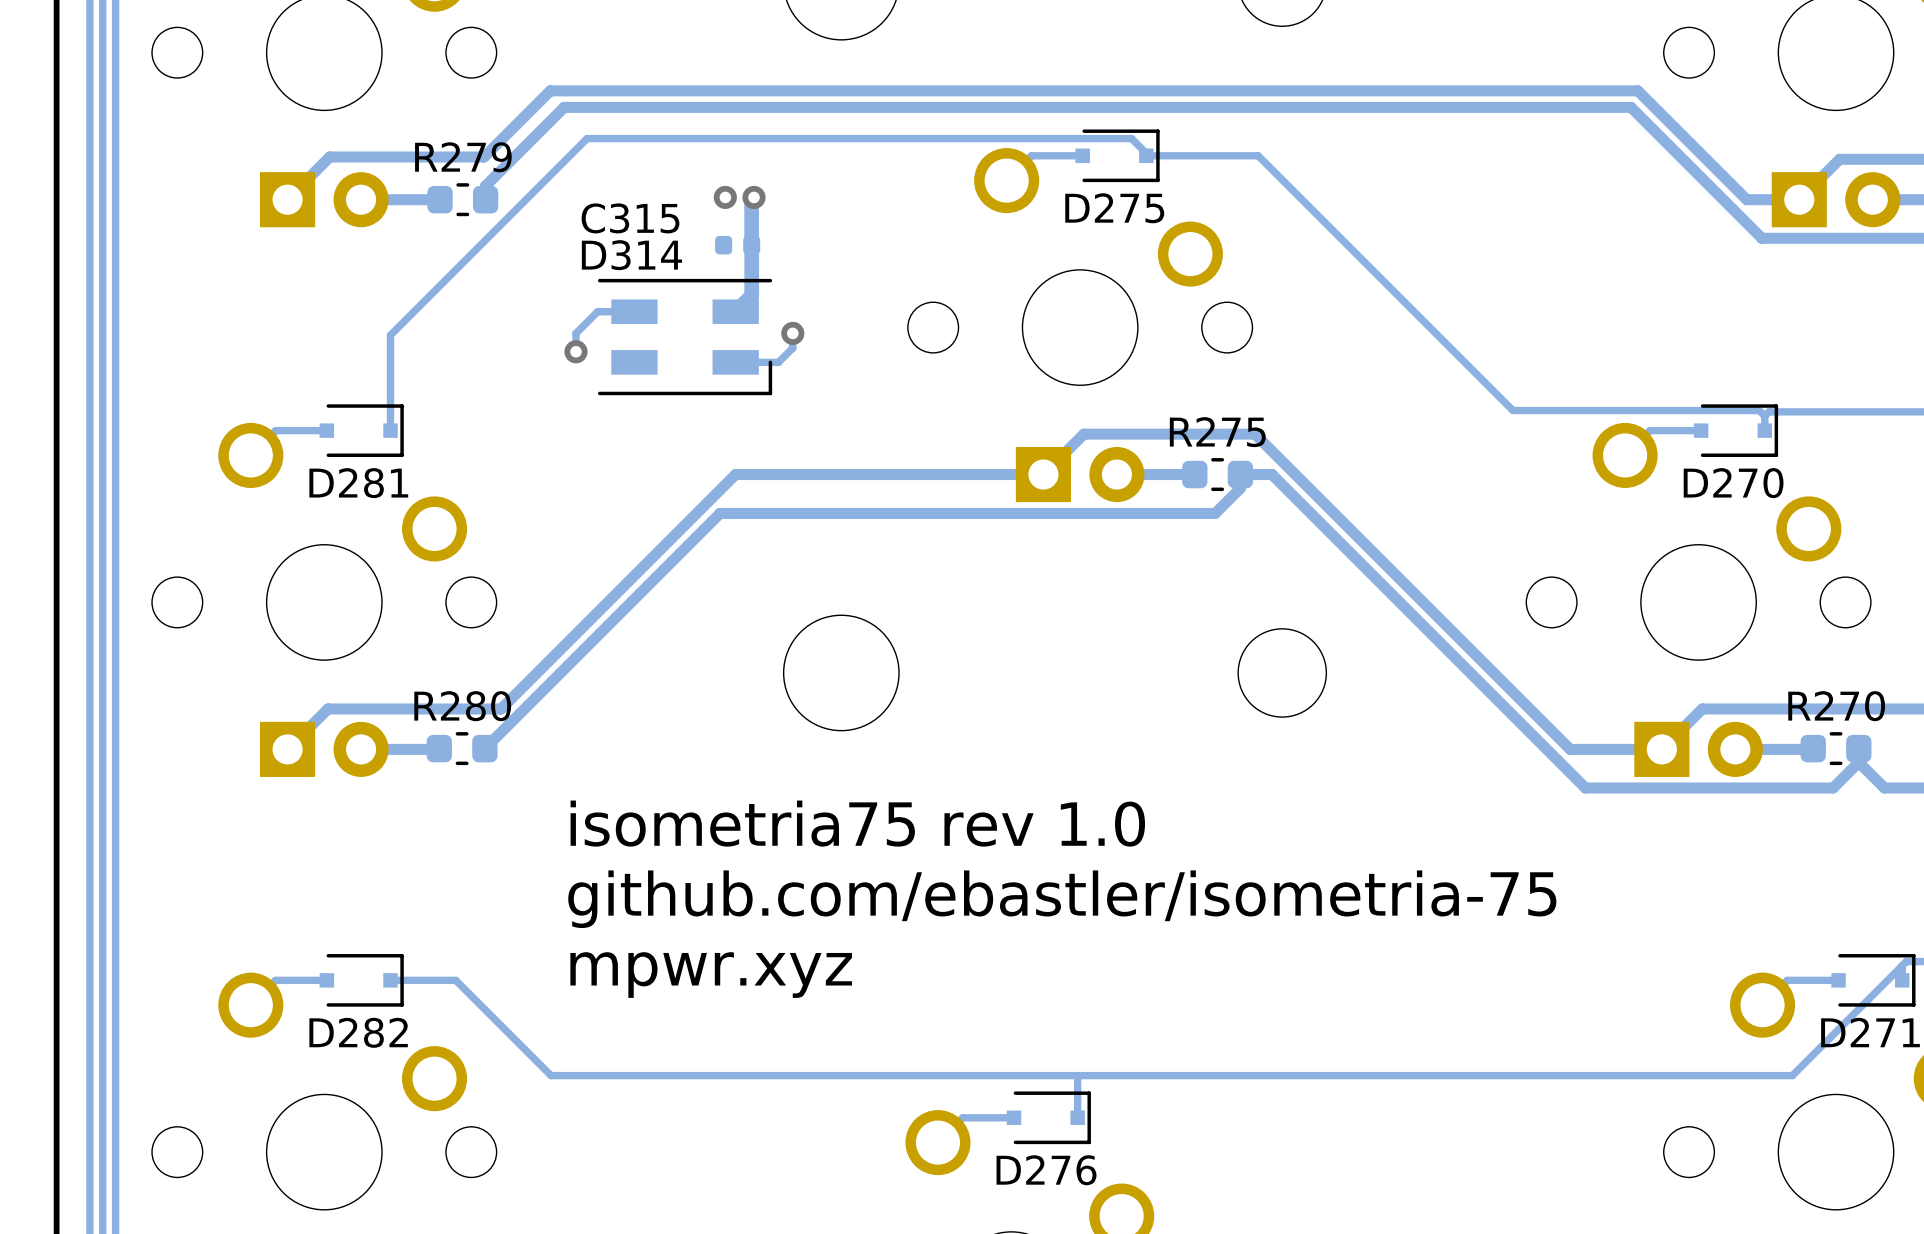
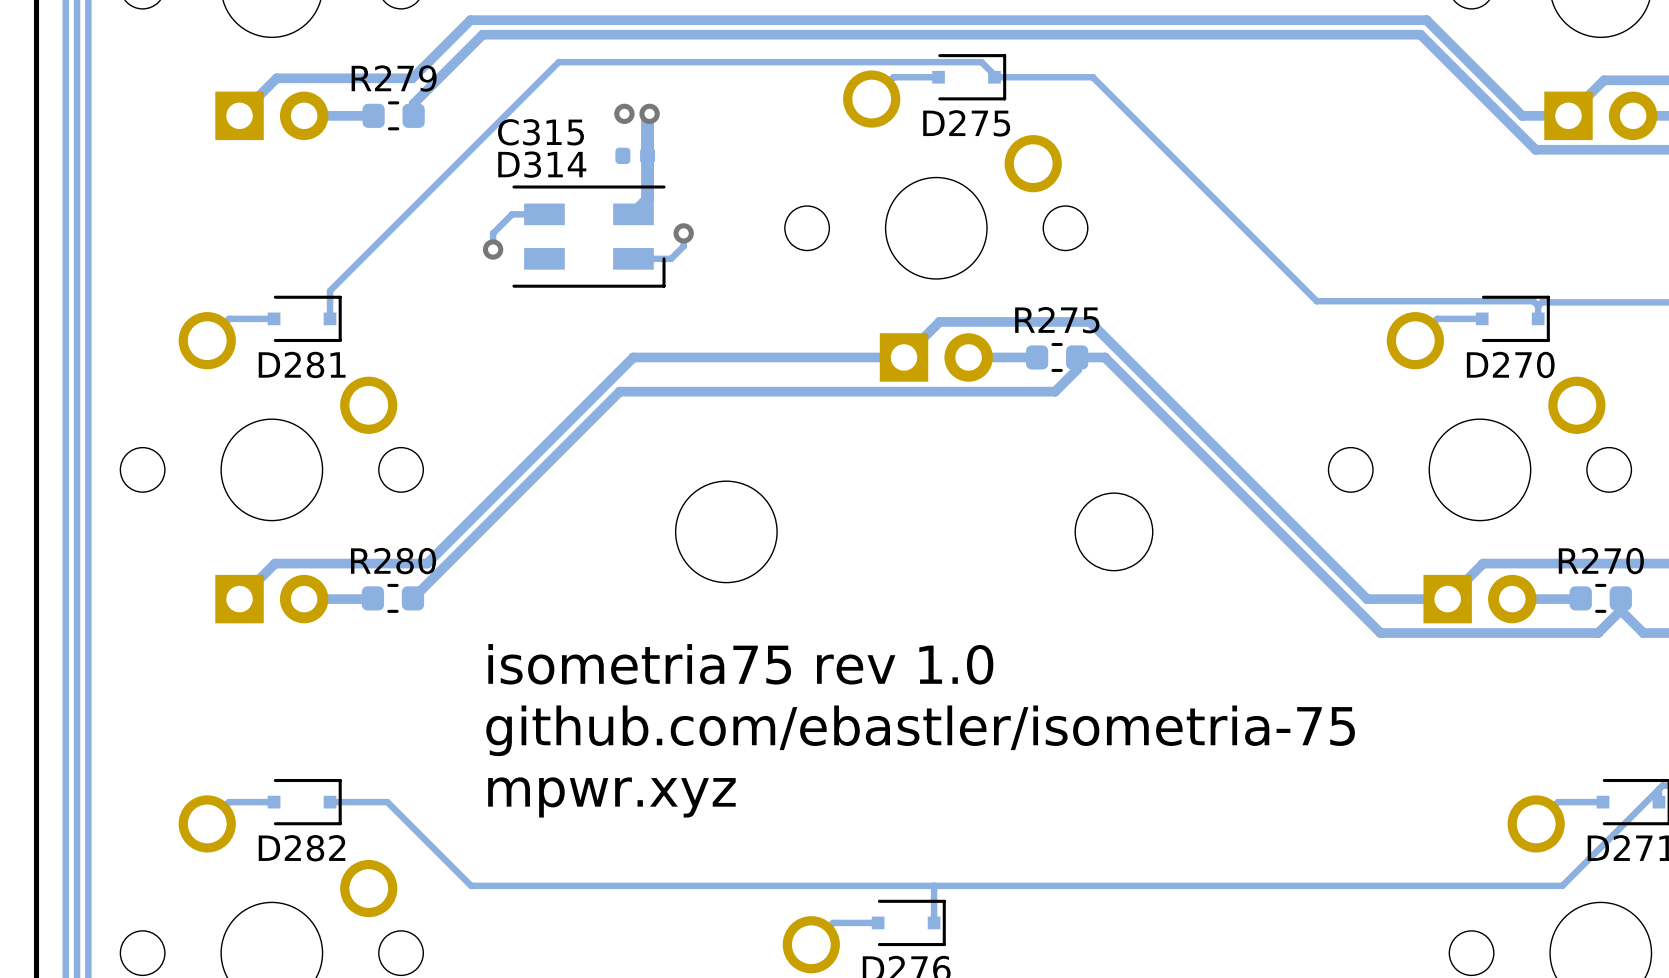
track: (650, 138) (587, 138) (390, 335) (390, 398) -> (558, 62) (330, 290)

